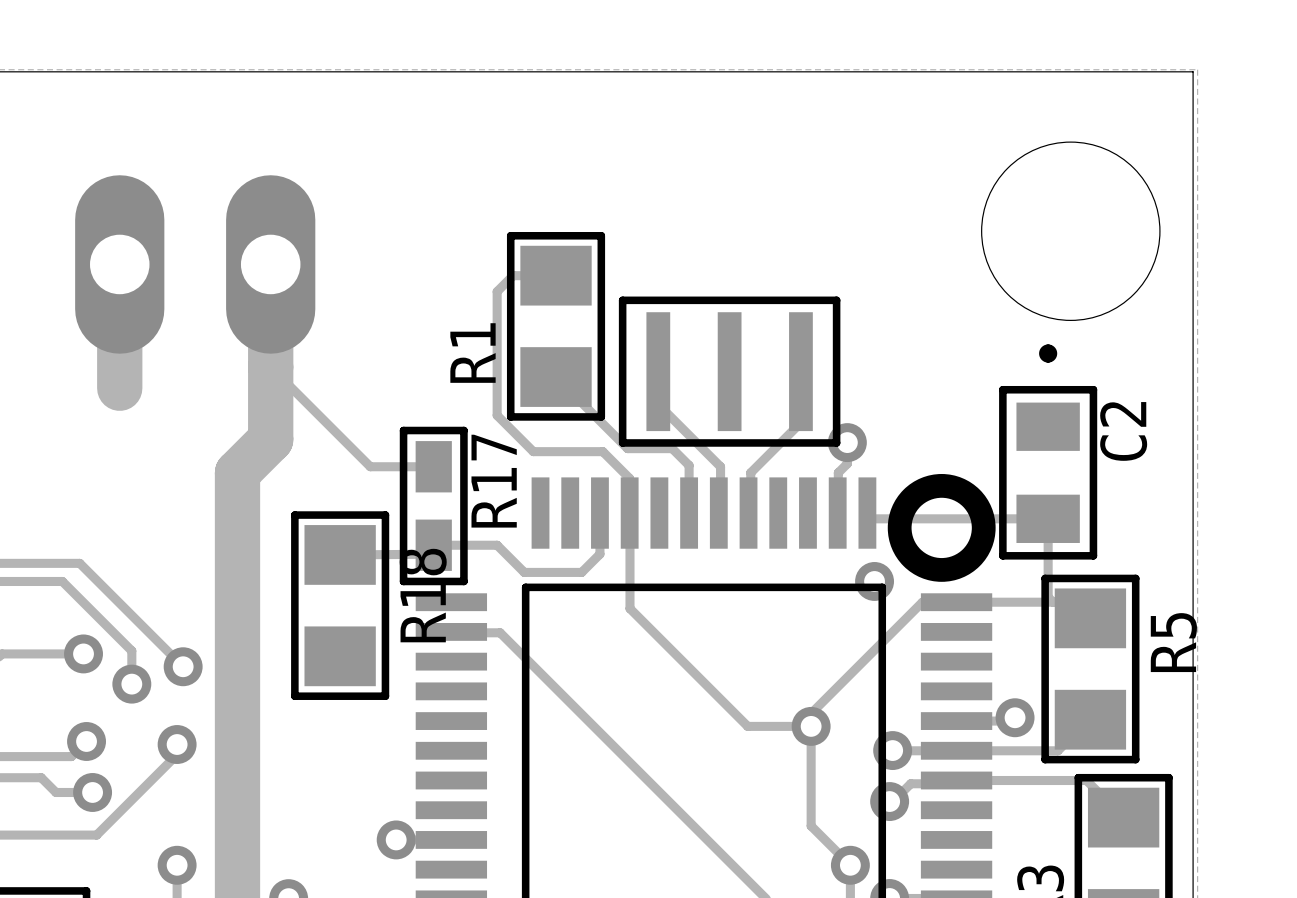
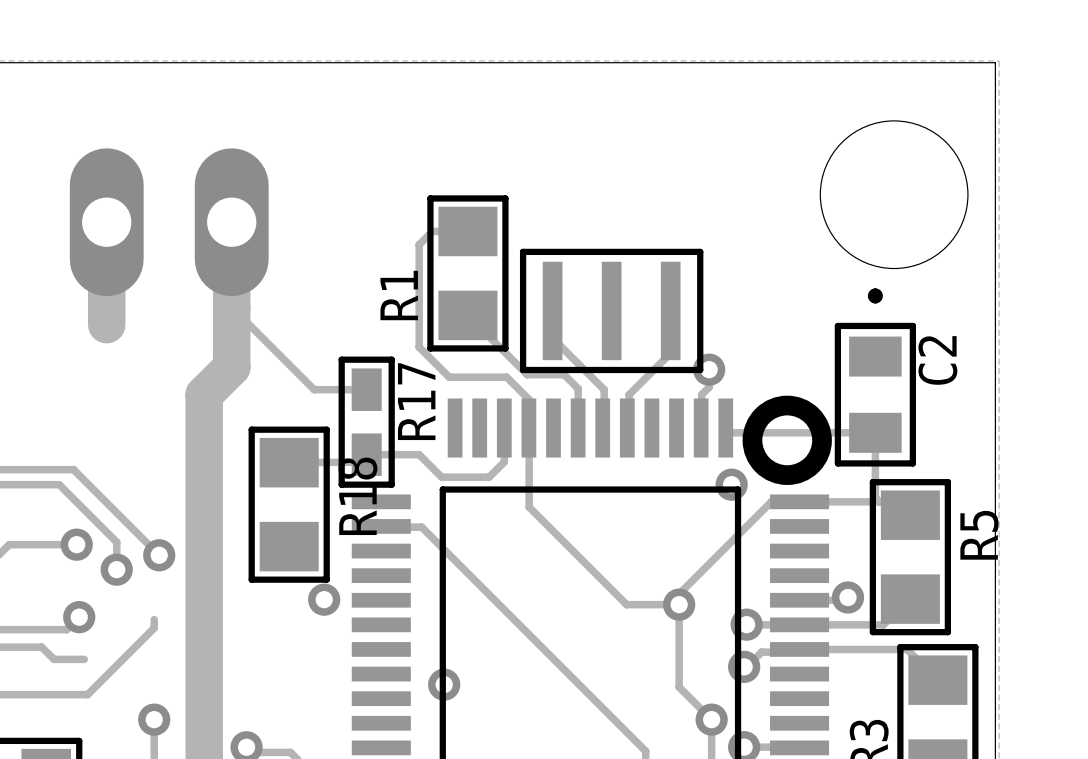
via: none -> (324, 599)
via: (177, 744) -> none
via: (92, 792) -> none
via: none -> (444, 684)
via: (396, 839) -> none

